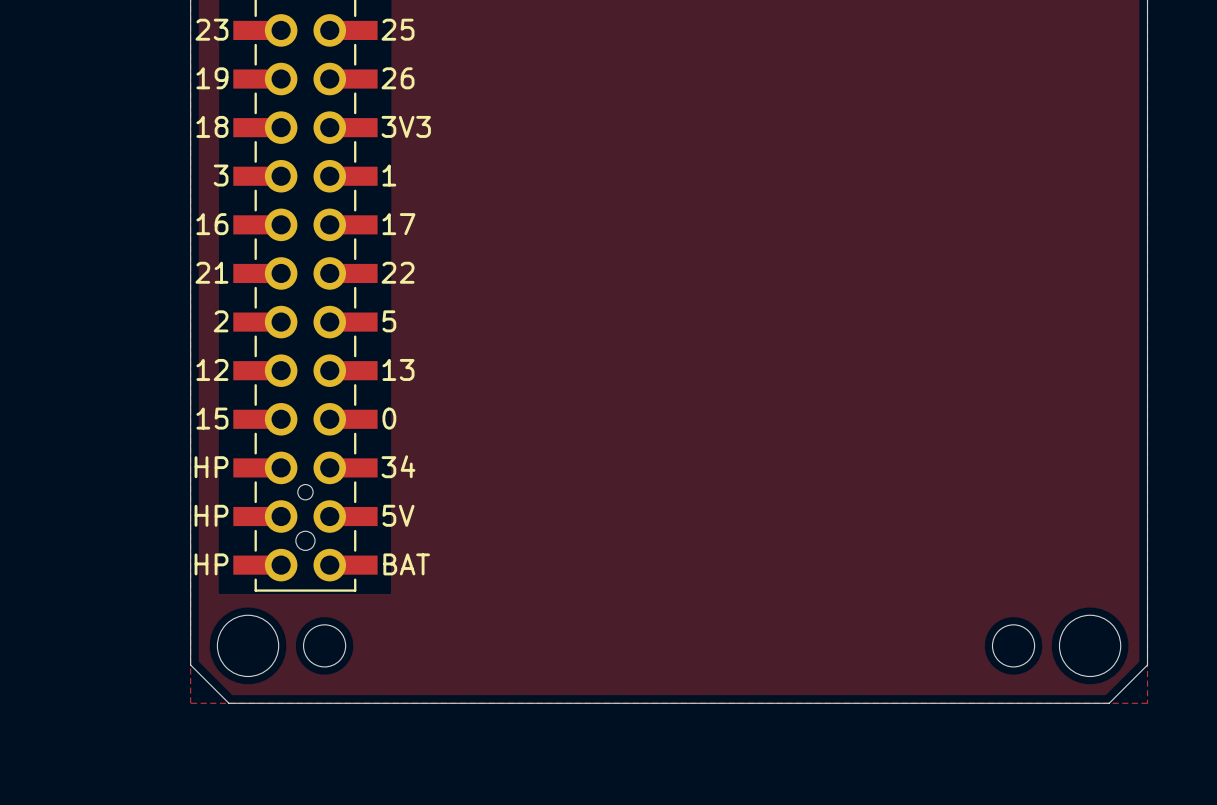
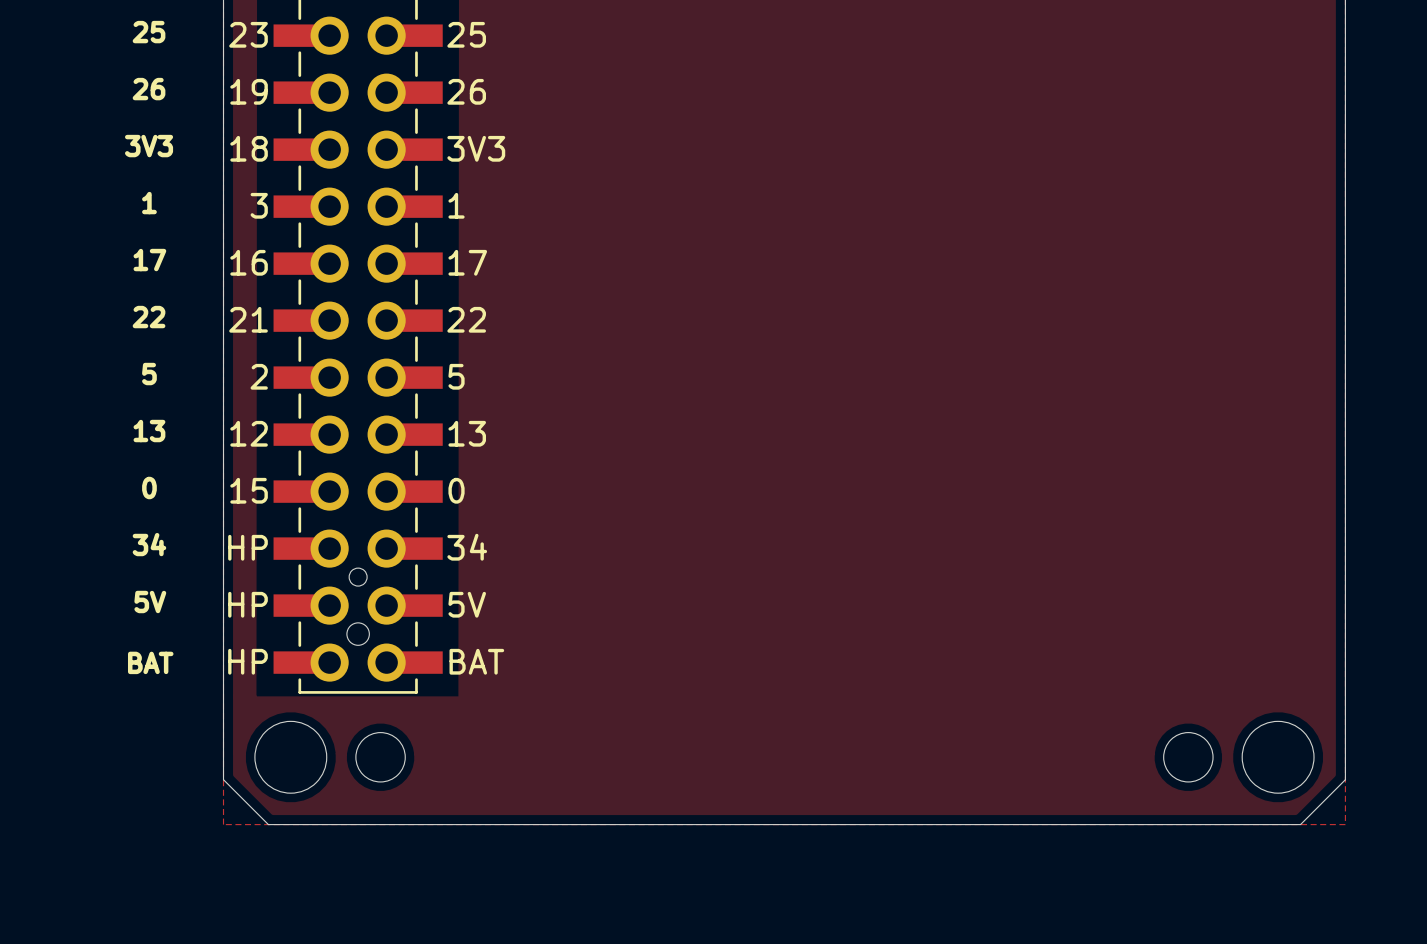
text: none -> 25 (149, 32)
text: none -> 26 (149, 89)
text: none -> 3V3 (149, 146)
text: none -> 1 (149, 203)
text: none -> 17 (149, 260)
text: none -> 22 (149, 317)
text: none -> 5 (149, 374)
text: none -> 13 (149, 431)
text: none -> 0 (149, 488)
text: none -> 34 (149, 544)
text: none -> 5V (150, 602)
text: none -> BAT (150, 662)

